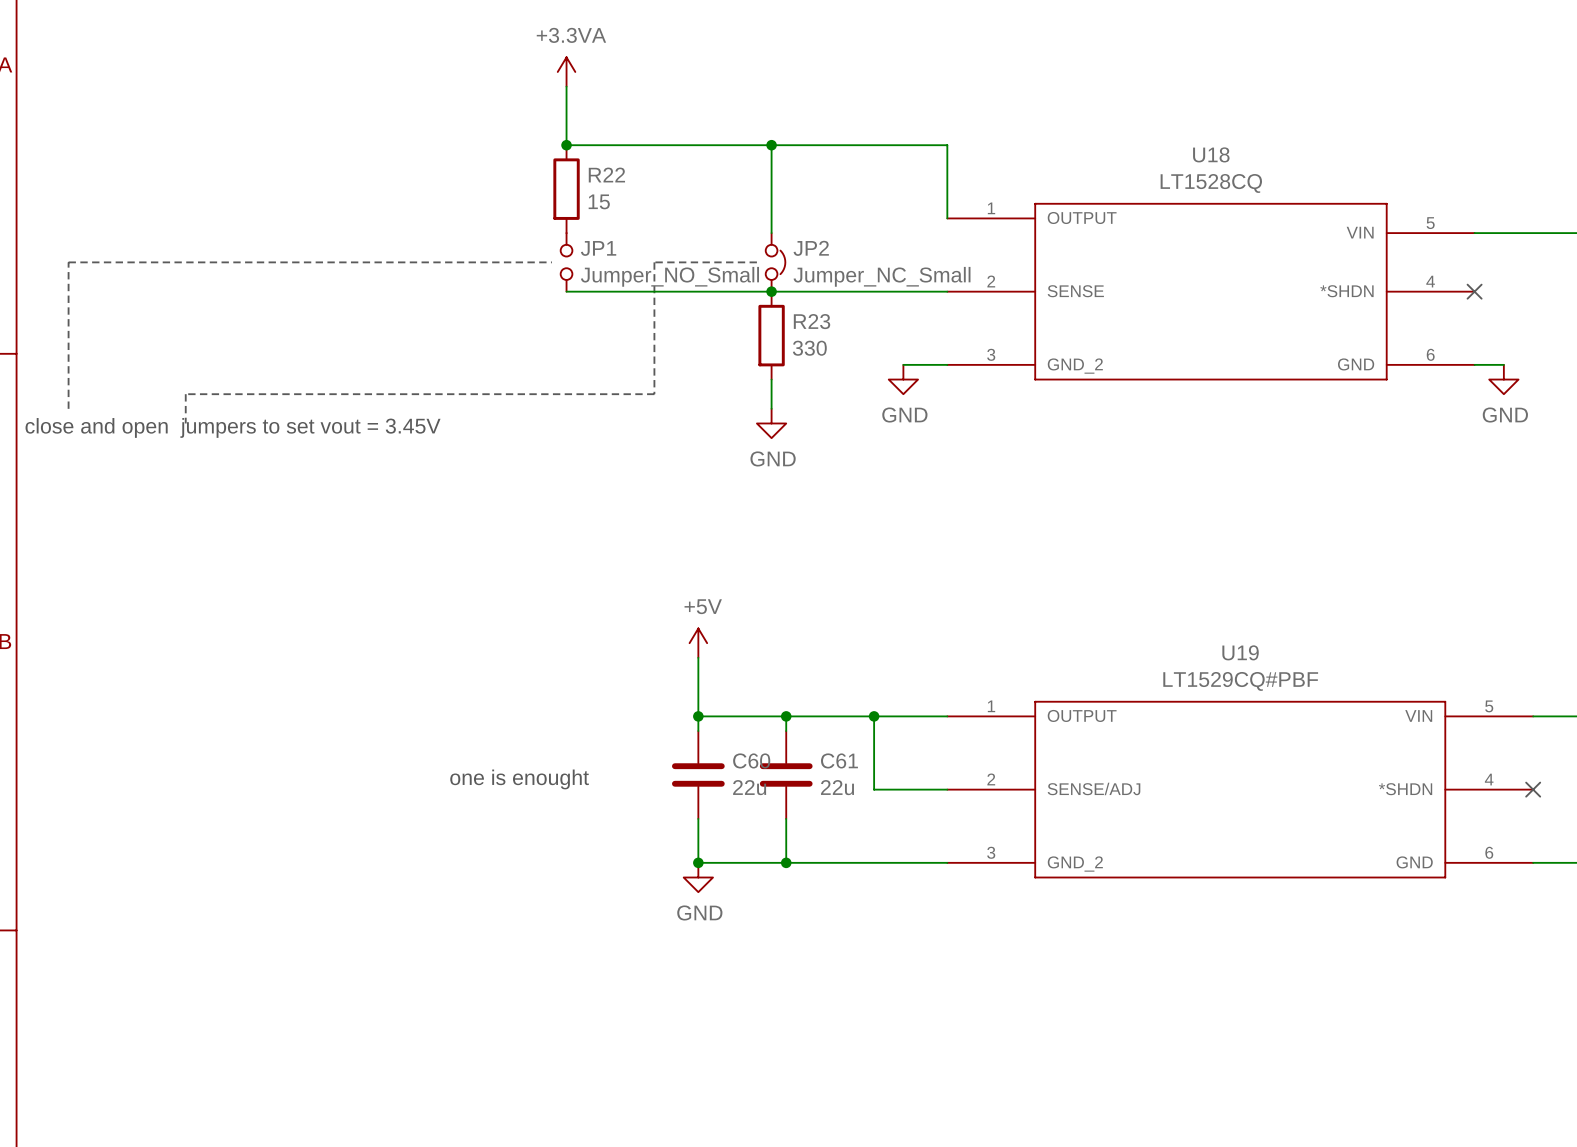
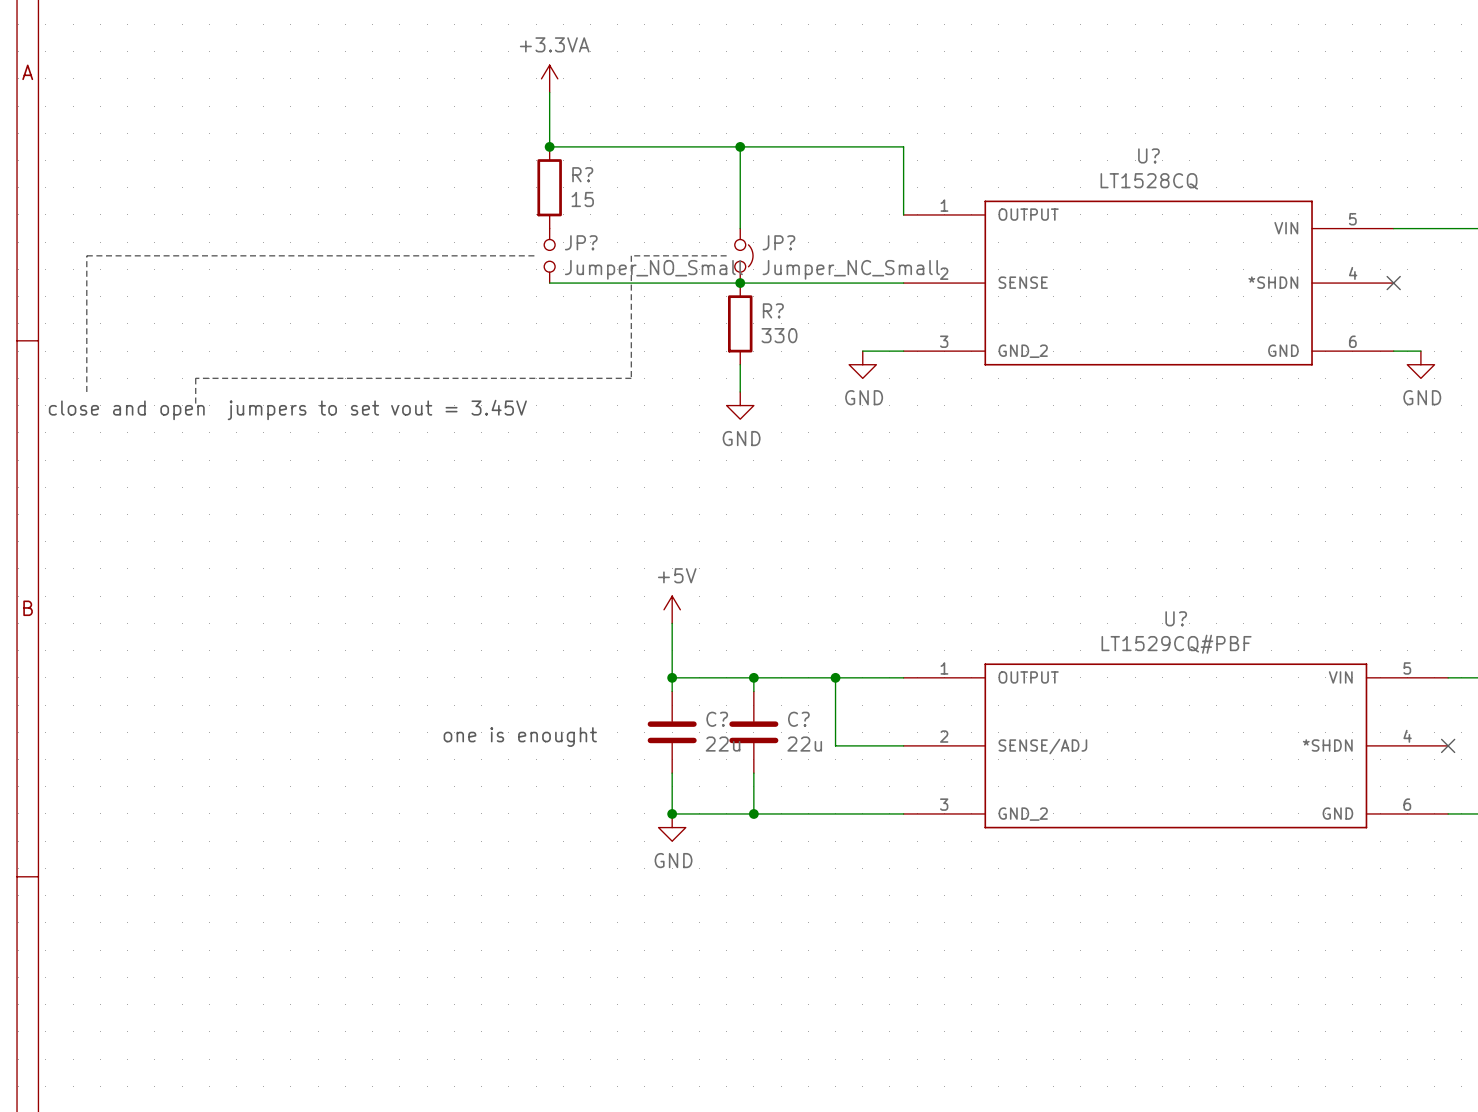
U18 name: U18 (1211, 154) -> U? (1148, 155)
R22 name: R22 (606, 175) -> R? (582, 174)
JP1 name: JP1 (598, 248) -> JP? (581, 242)
JP2 name: JP2 (811, 248) -> JP? (778, 242)
R23 name: R23 (812, 321) -> R? (773, 310)
U19 name: U19 (1240, 652) -> U? (1176, 618)
C60 name: C60 (751, 760) -> C? (717, 719)
C61 name: C61 (839, 760) -> C? (798, 719)

